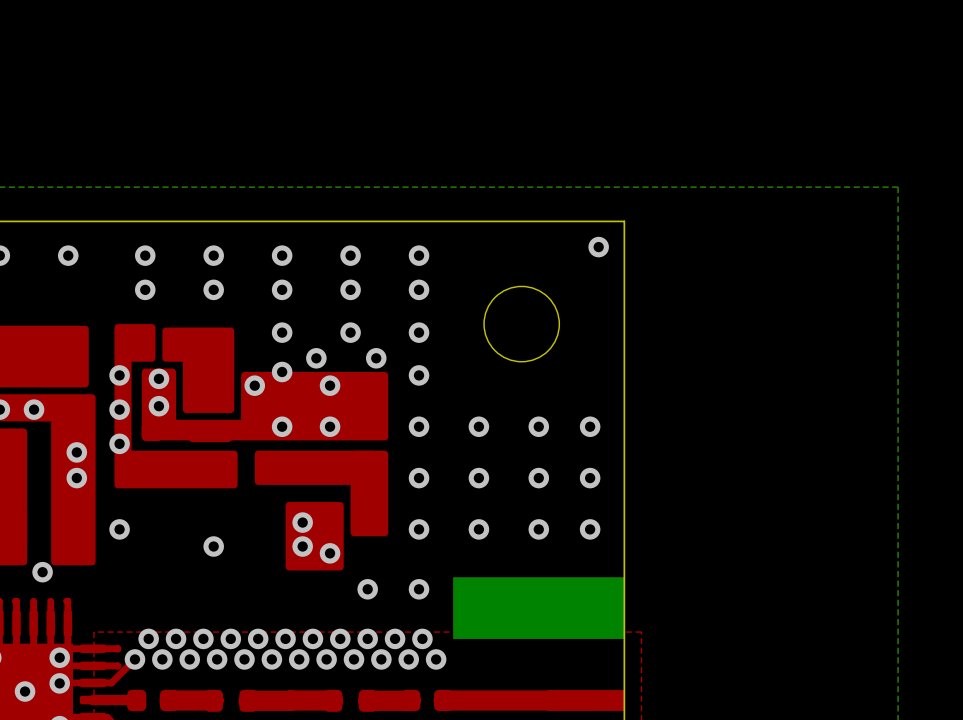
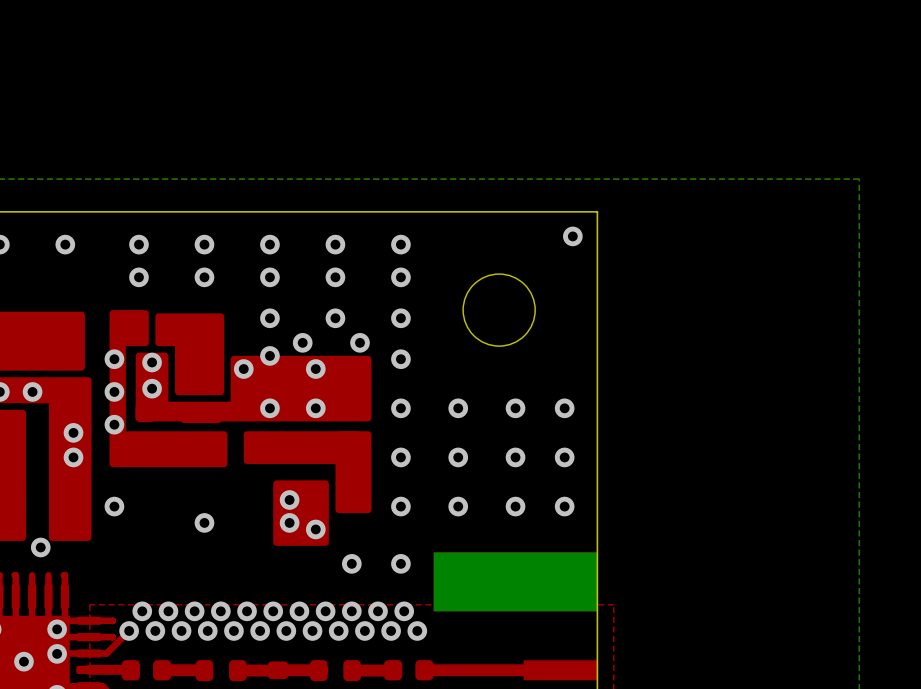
top track width: thick (213, 700) (169, 700) -> thin (204, 670) (162, 670)
top track width: thick (290, 700) (248, 700) -> thin (277, 670) (237, 670)
top track width: thick (332, 700) (290, 700) -> thin (318, 670) (278, 670)
top track width: thick (410, 700) (368, 700) -> thin (392, 670) (352, 670)
top track width: thick (585, 700) (443, 700) -> thin (560, 670) (424, 670)

